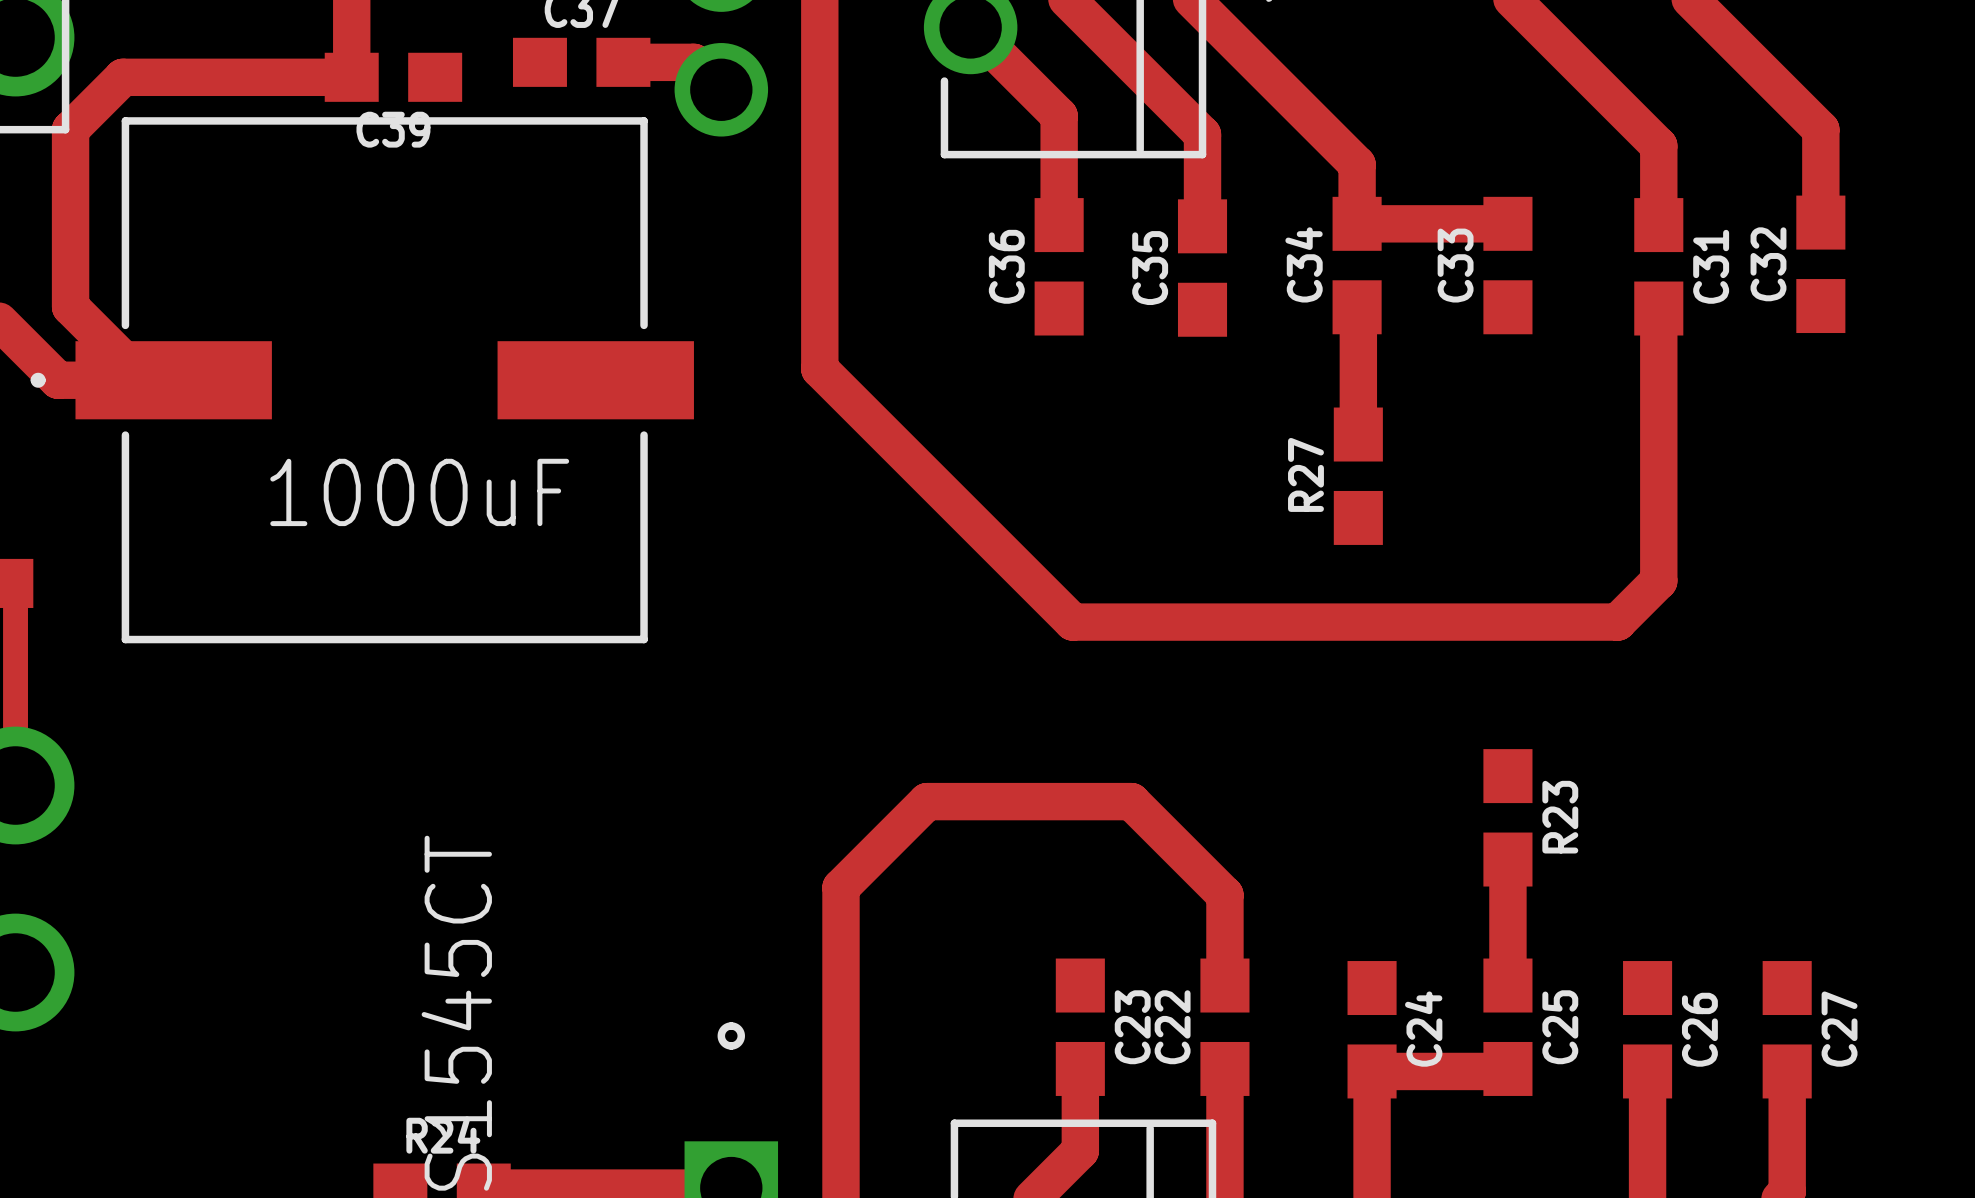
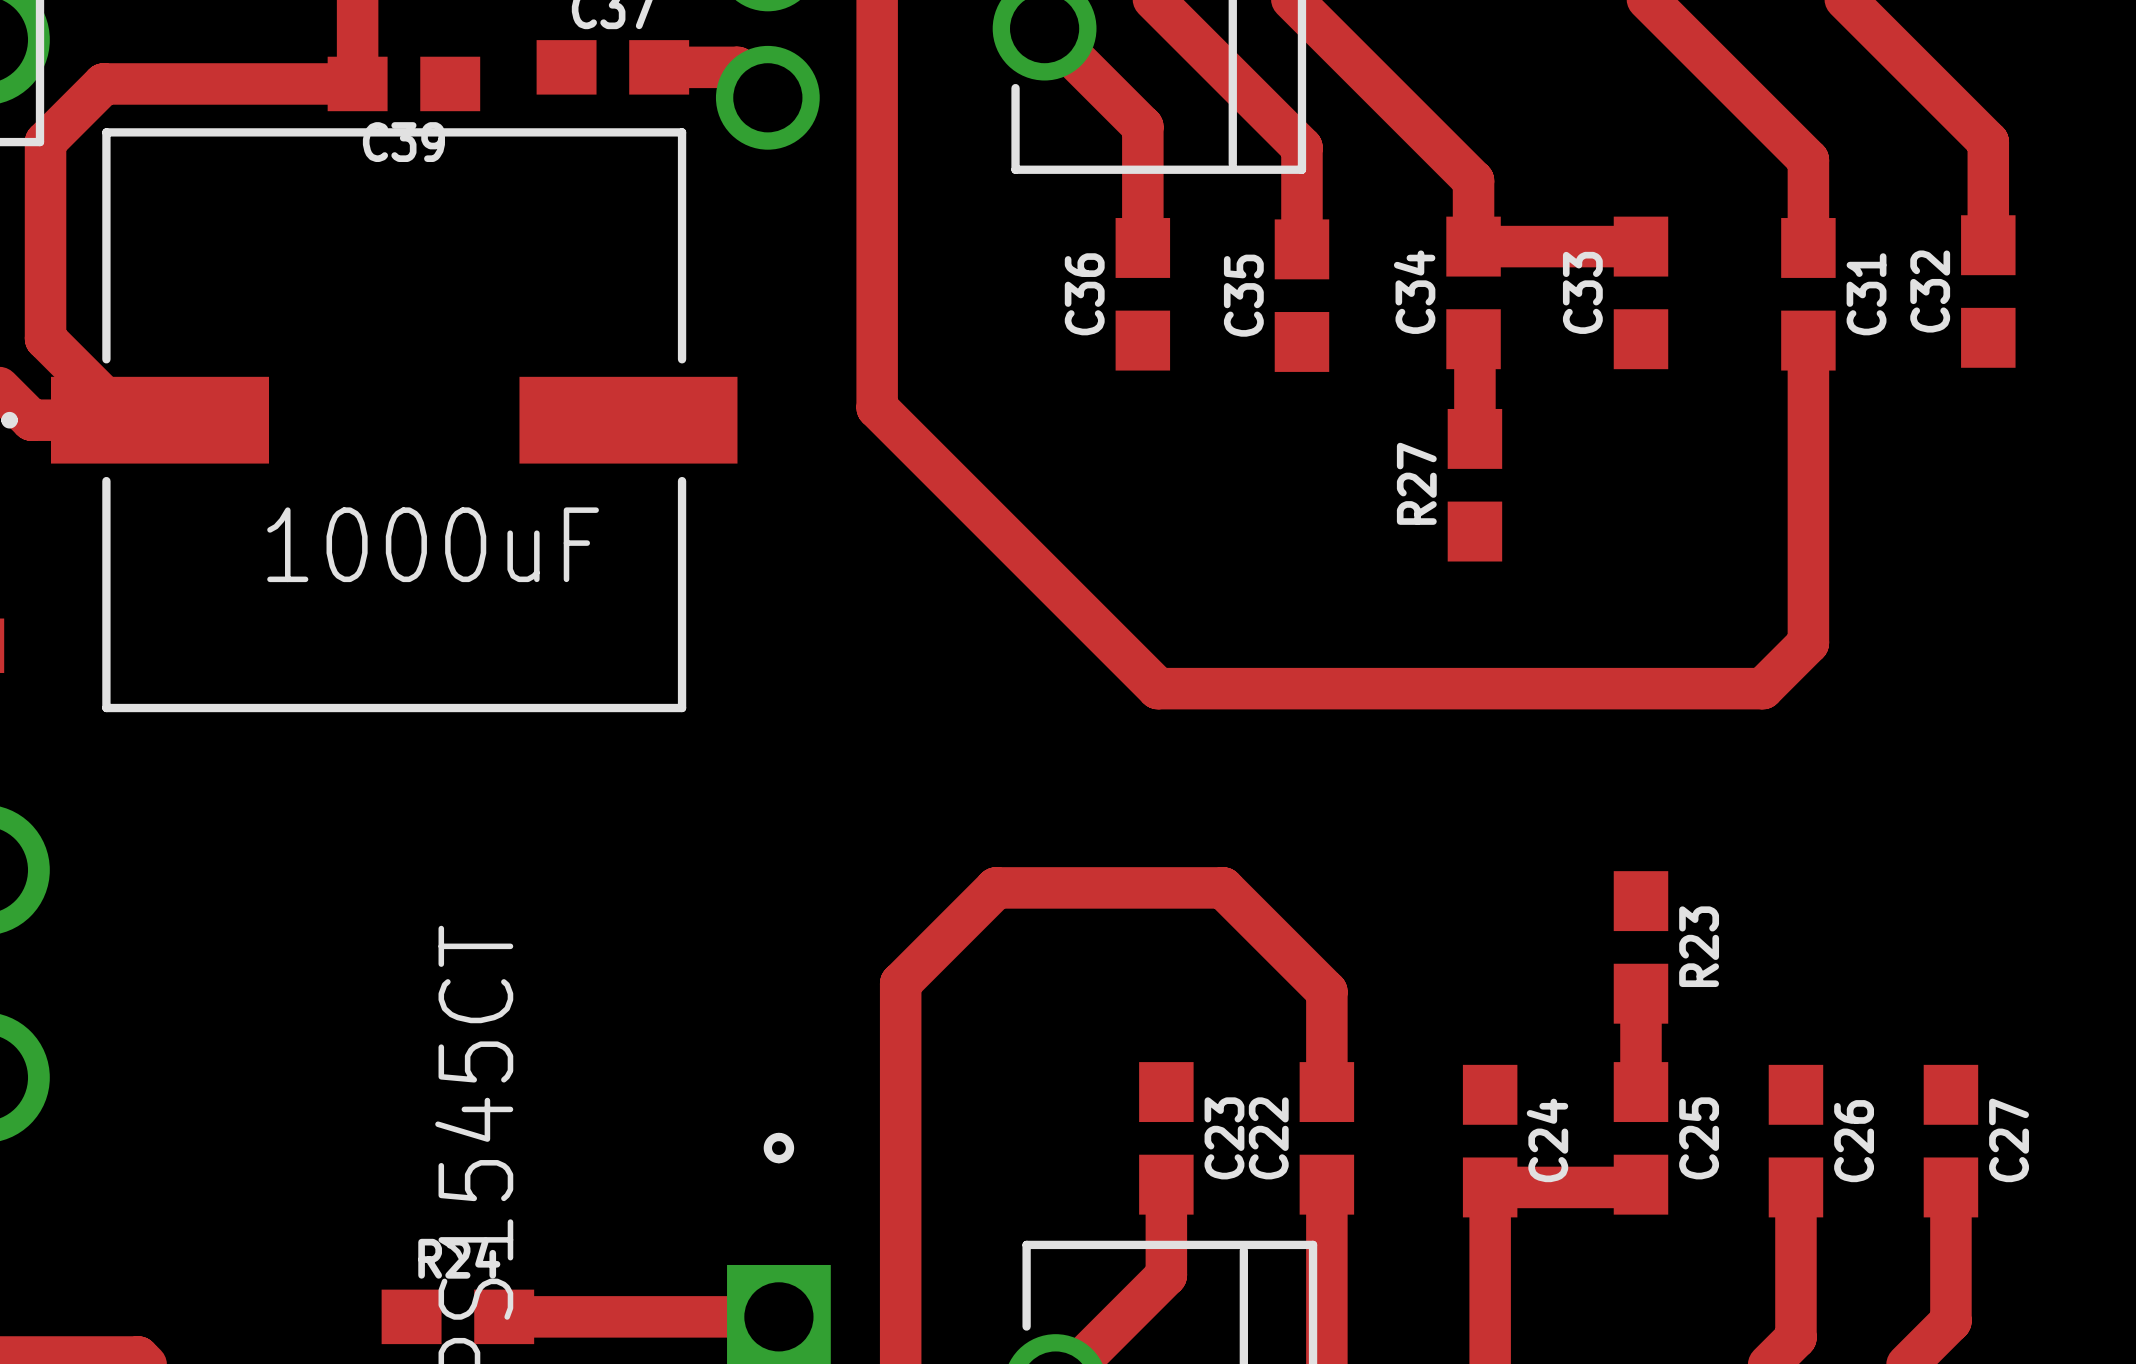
R27 position: (1358, 476) -> (1474, 485)
R23 position: (1507, 817) -> (1640, 947)

